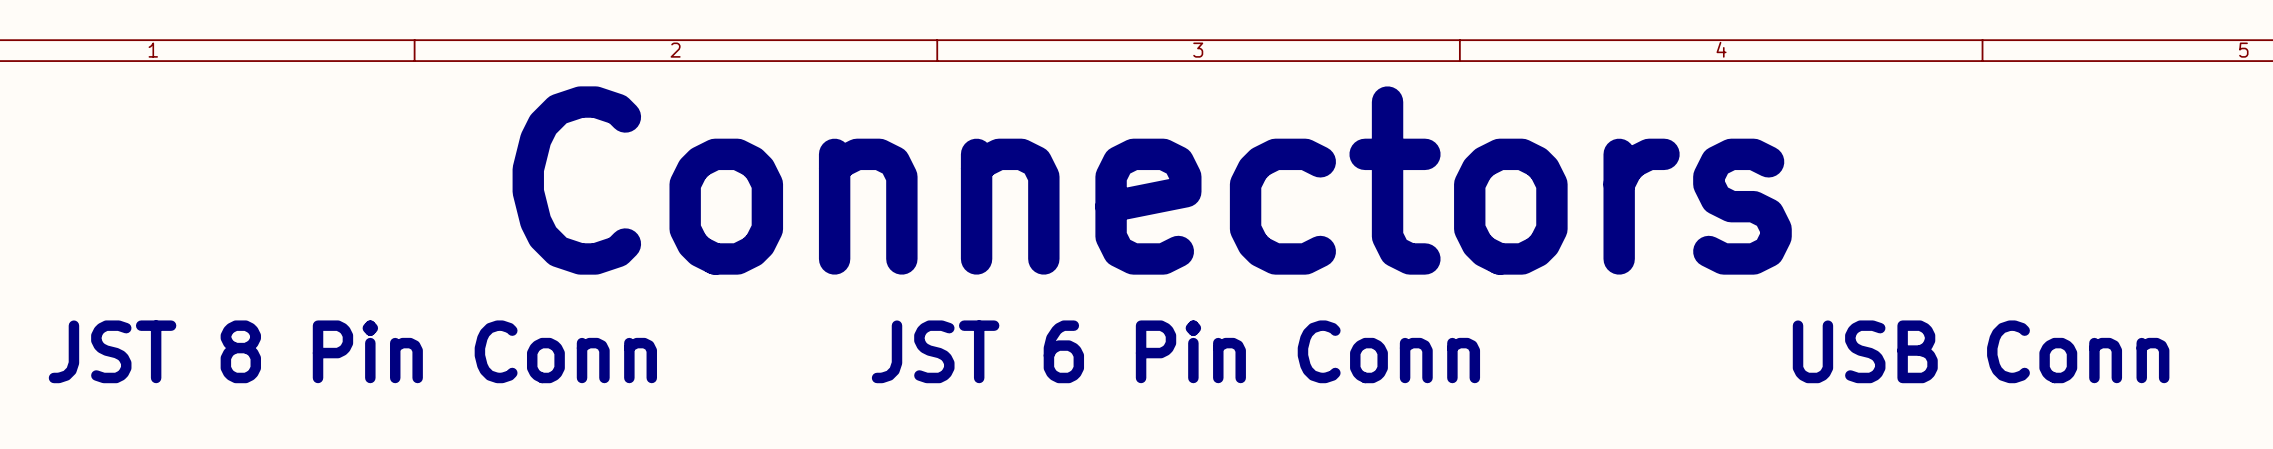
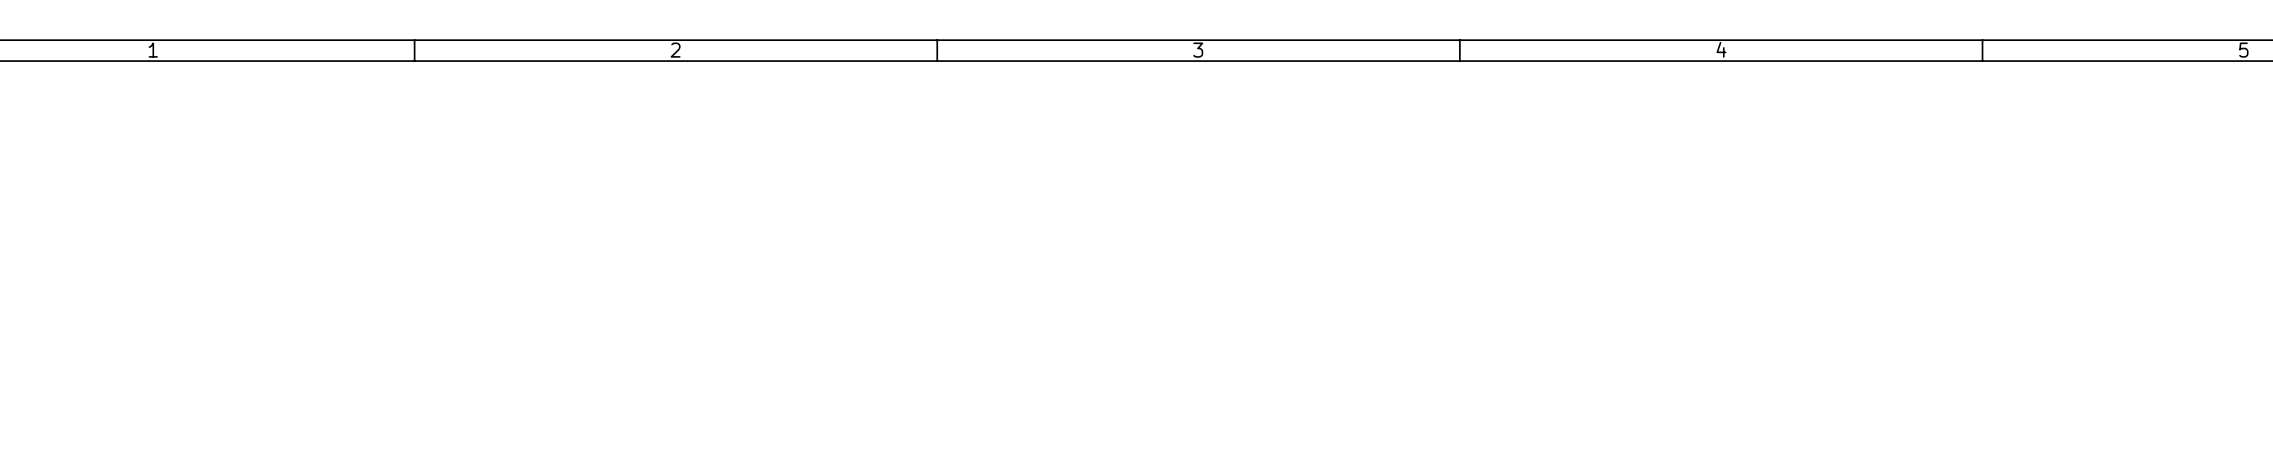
text: Connectors (1152, 180) -> none
text: JST 8 Pin Conn (352, 351) -> none
text: JST 6 Pin Conn (1175, 351) -> none
text: USB Conn (1981, 351) -> none

